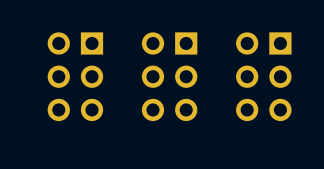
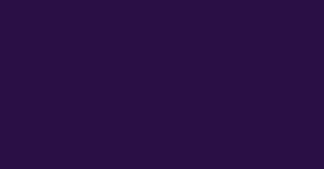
part: (75, 76) -> none
part: (169, 76) -> none
part: (263, 76) -> none

